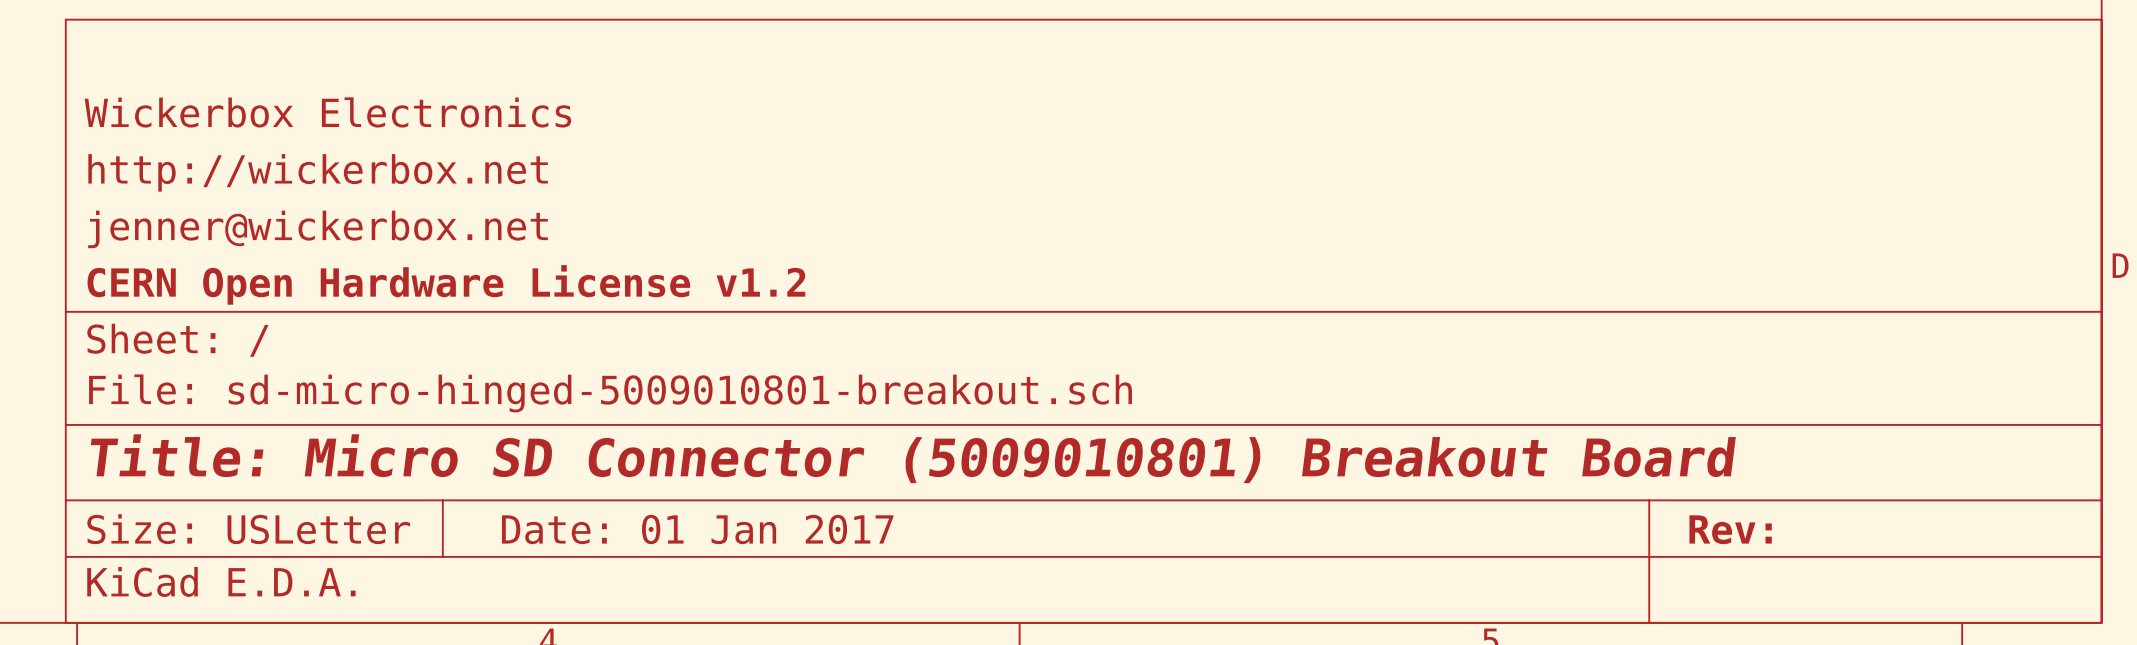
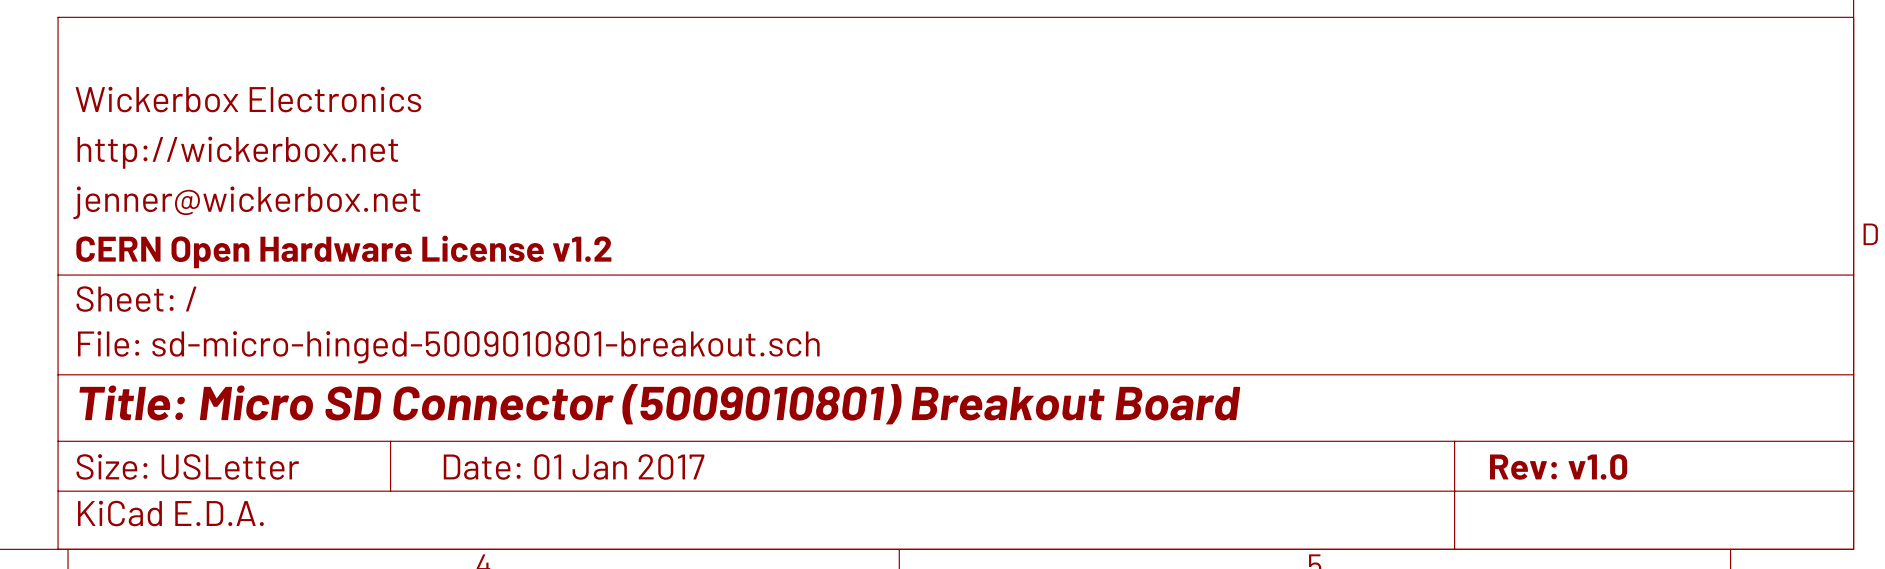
title block: Rev: (1730, 529) -> Rev: v1.0 (1558, 467)

